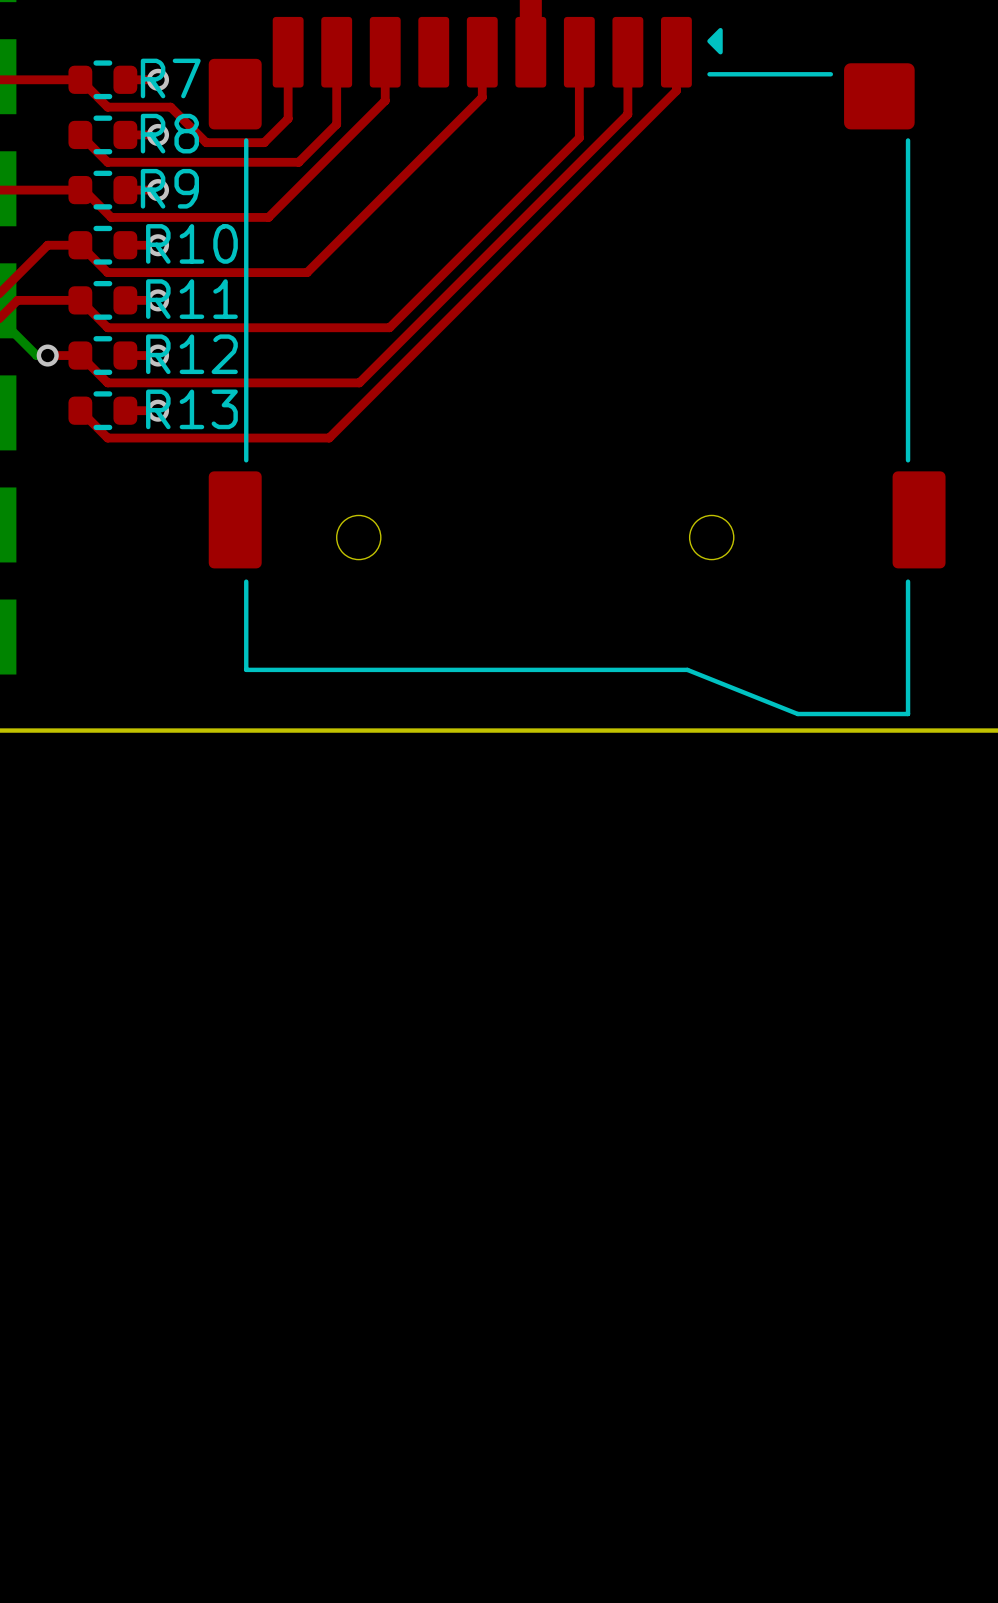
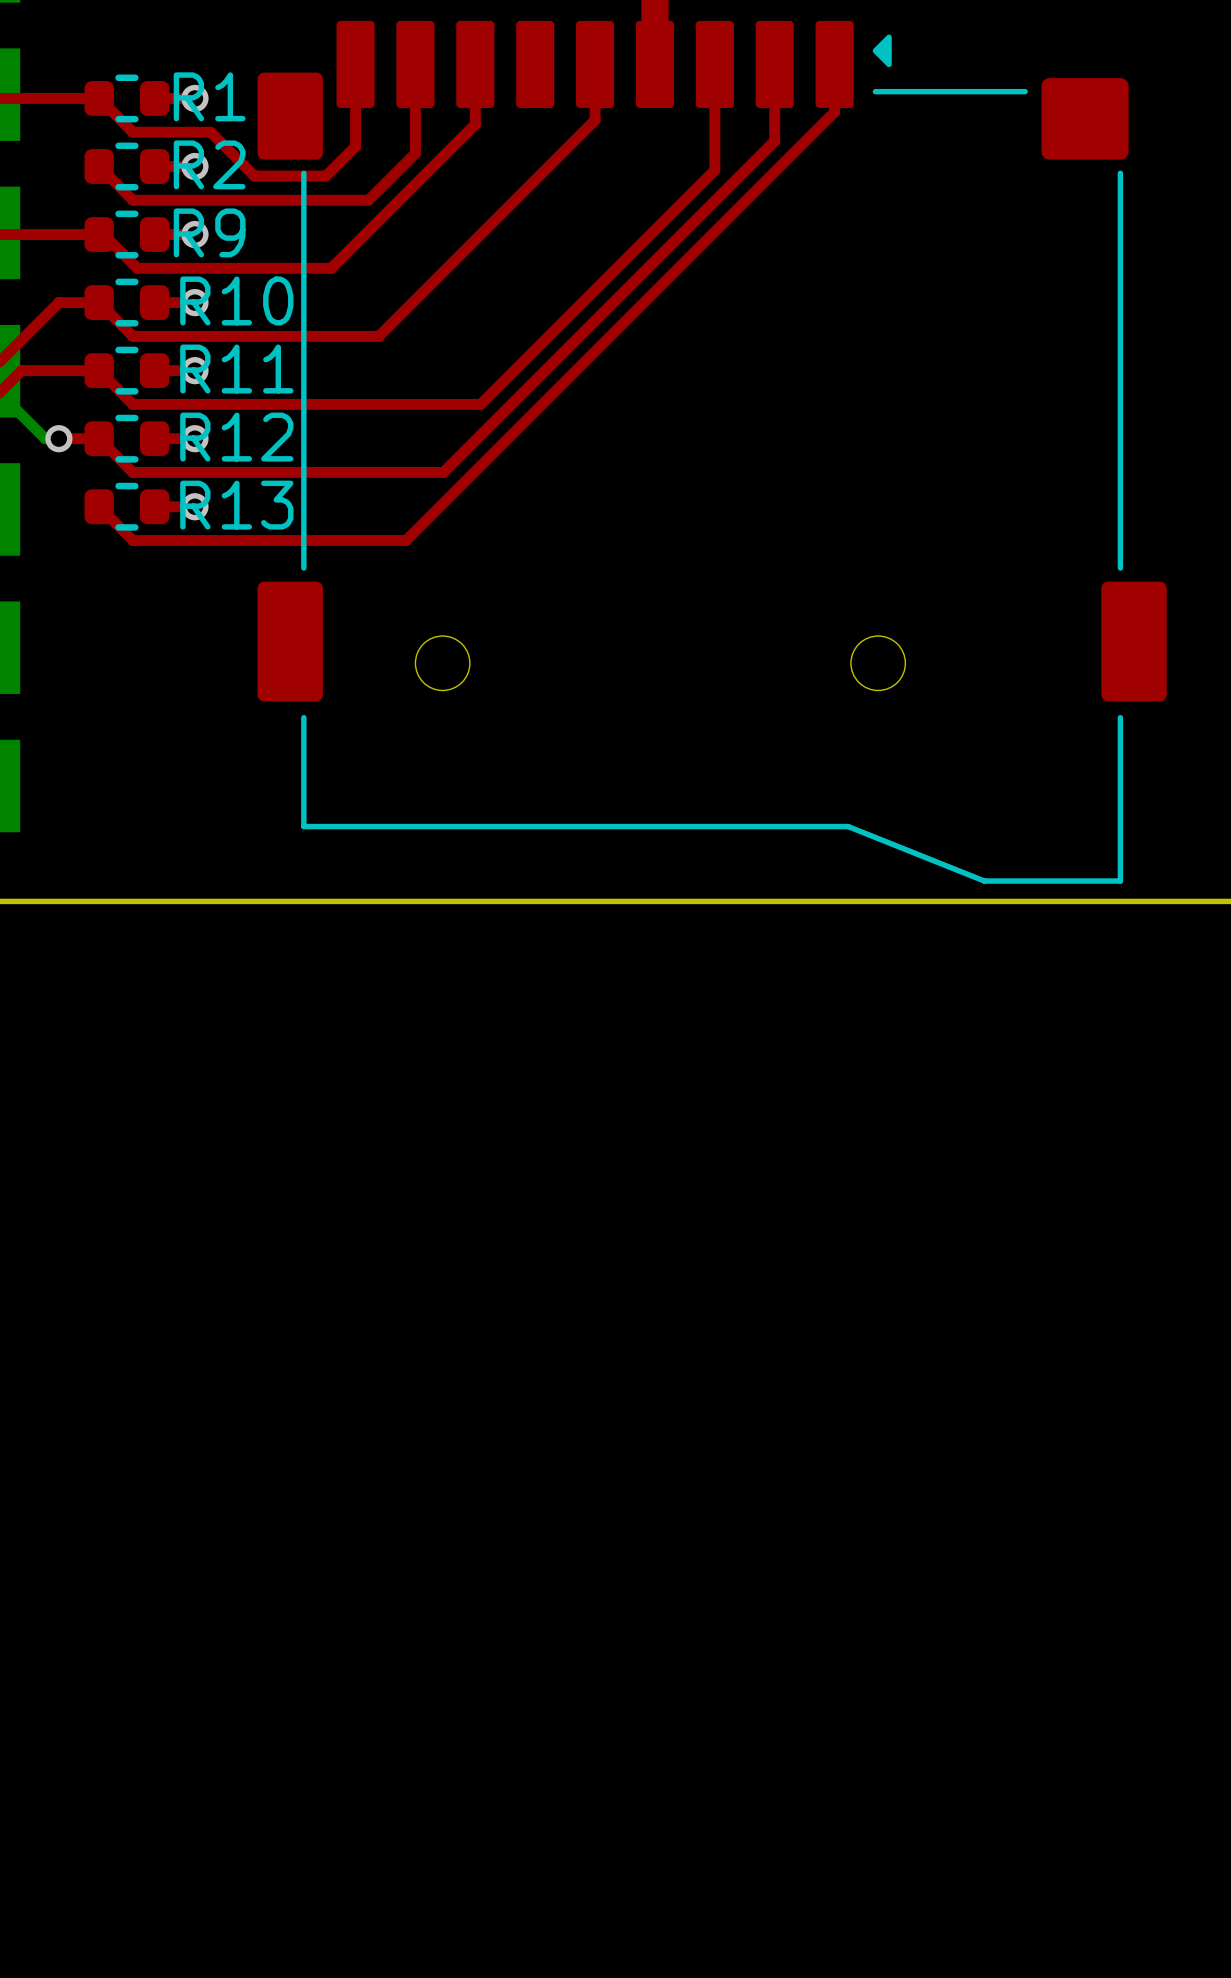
R7 name: R7 (170, 78) -> R1 (209, 96)
R8 name: R8 (169, 133) -> R2 (209, 164)

